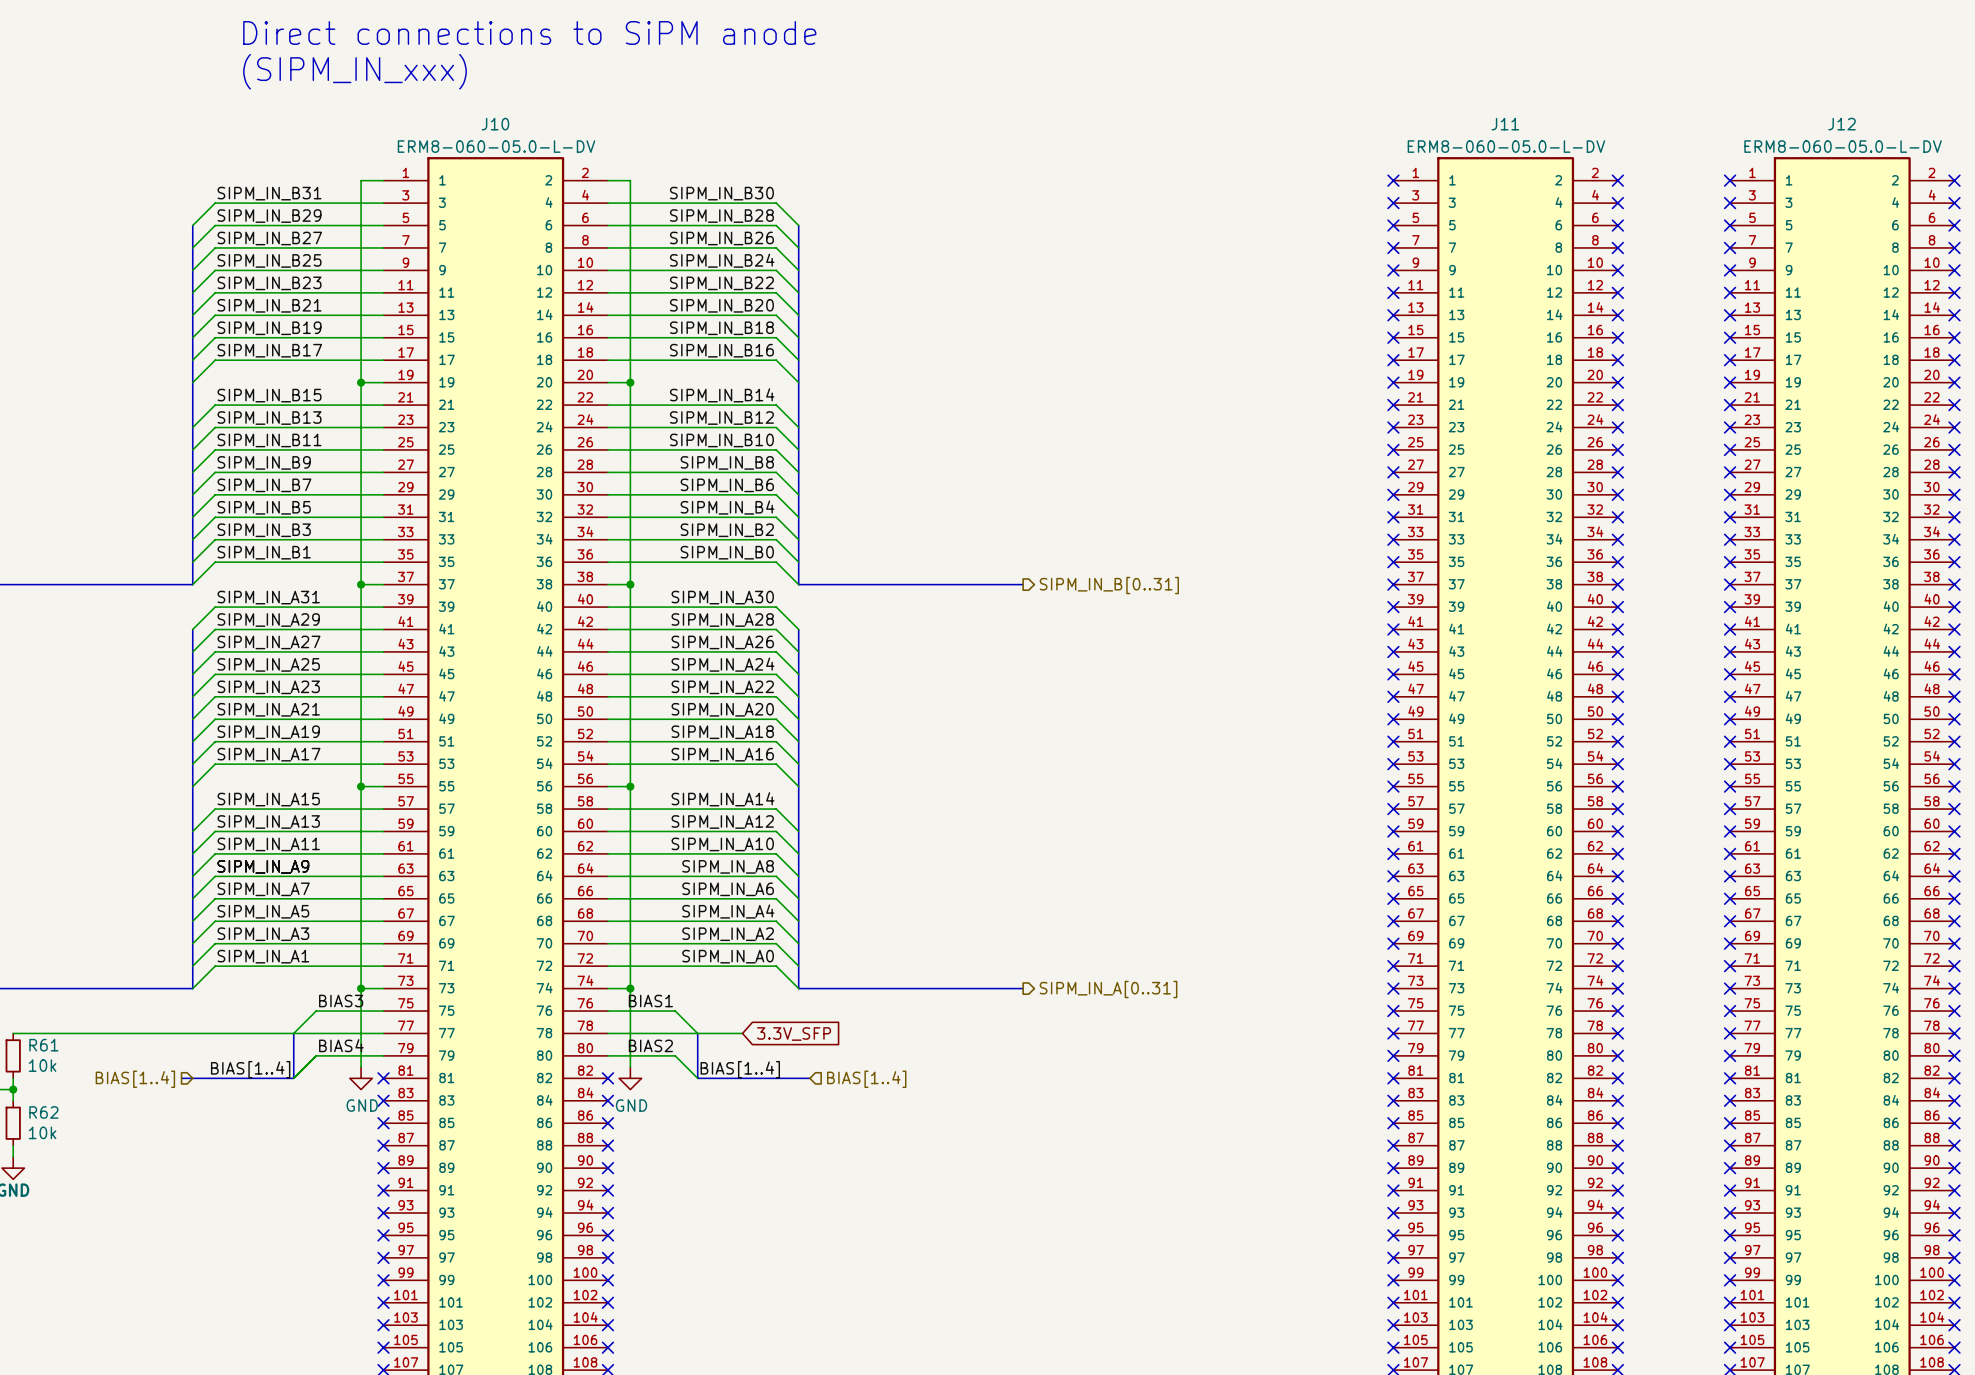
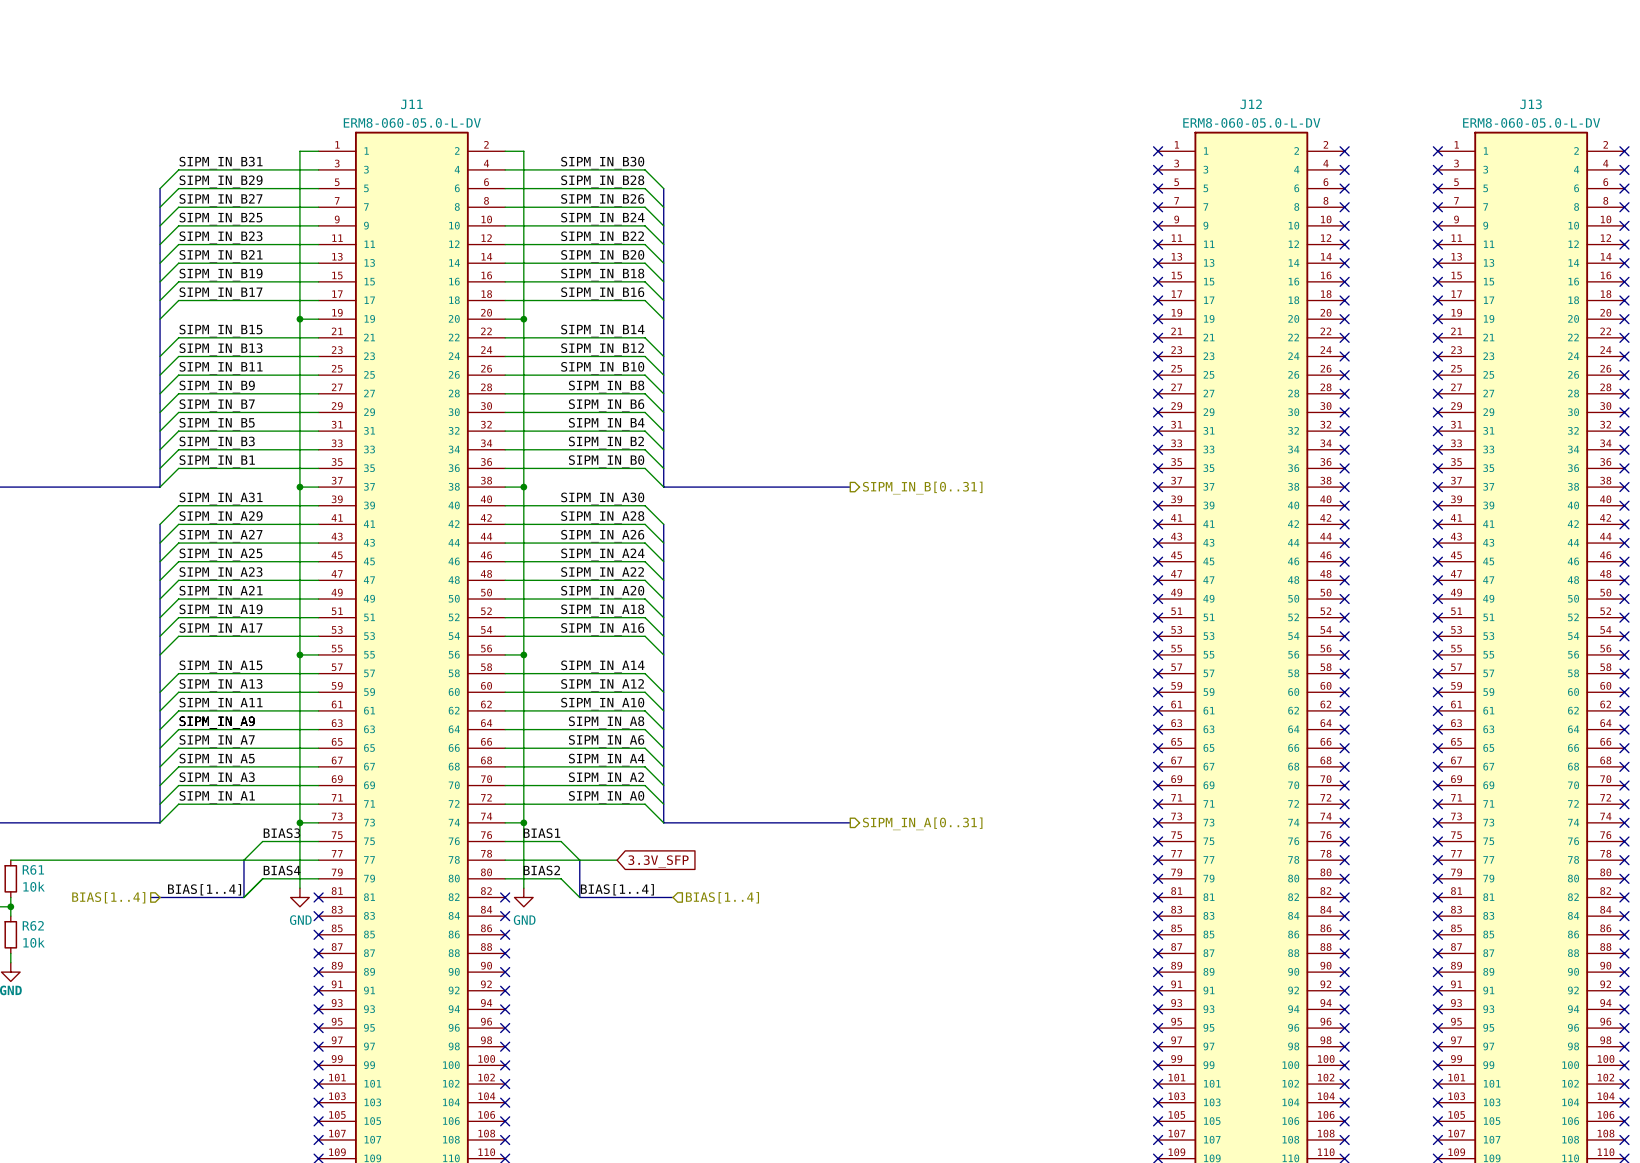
text: Direct connections to SiPM anode (529, 32) -> none
text: (SIPM_IN_xxx) (355, 71) -> none
J10 name: J10 (495, 124) -> J11 (411, 104)
J11 name: J11 (1505, 124) -> J12 (1251, 104)
J12 name: J12 (1842, 124) -> J13 (1531, 104)

